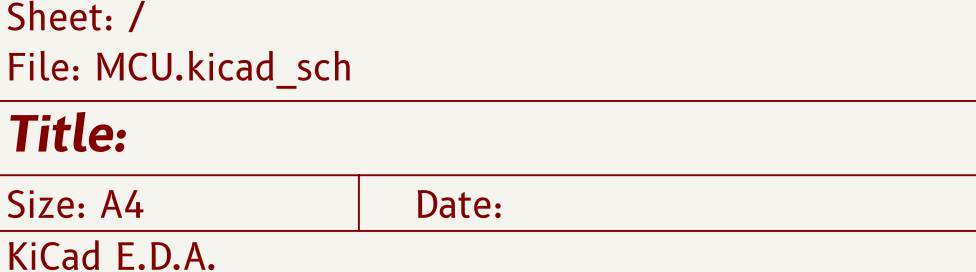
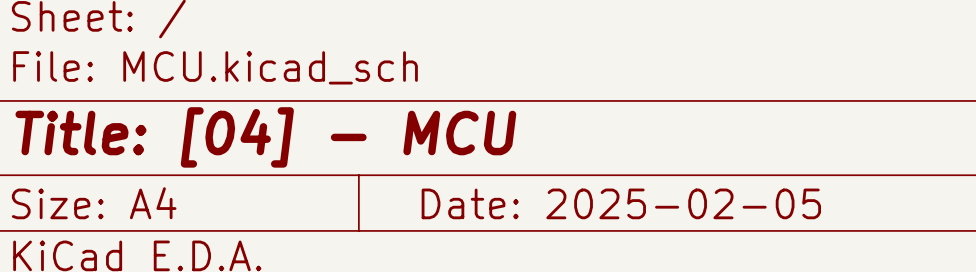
title block: Title: (68, 131) -> Title: [04] - MCU (265, 137)
title block: Date: (459, 204) -> Date: 2025-02-05 (621, 203)

